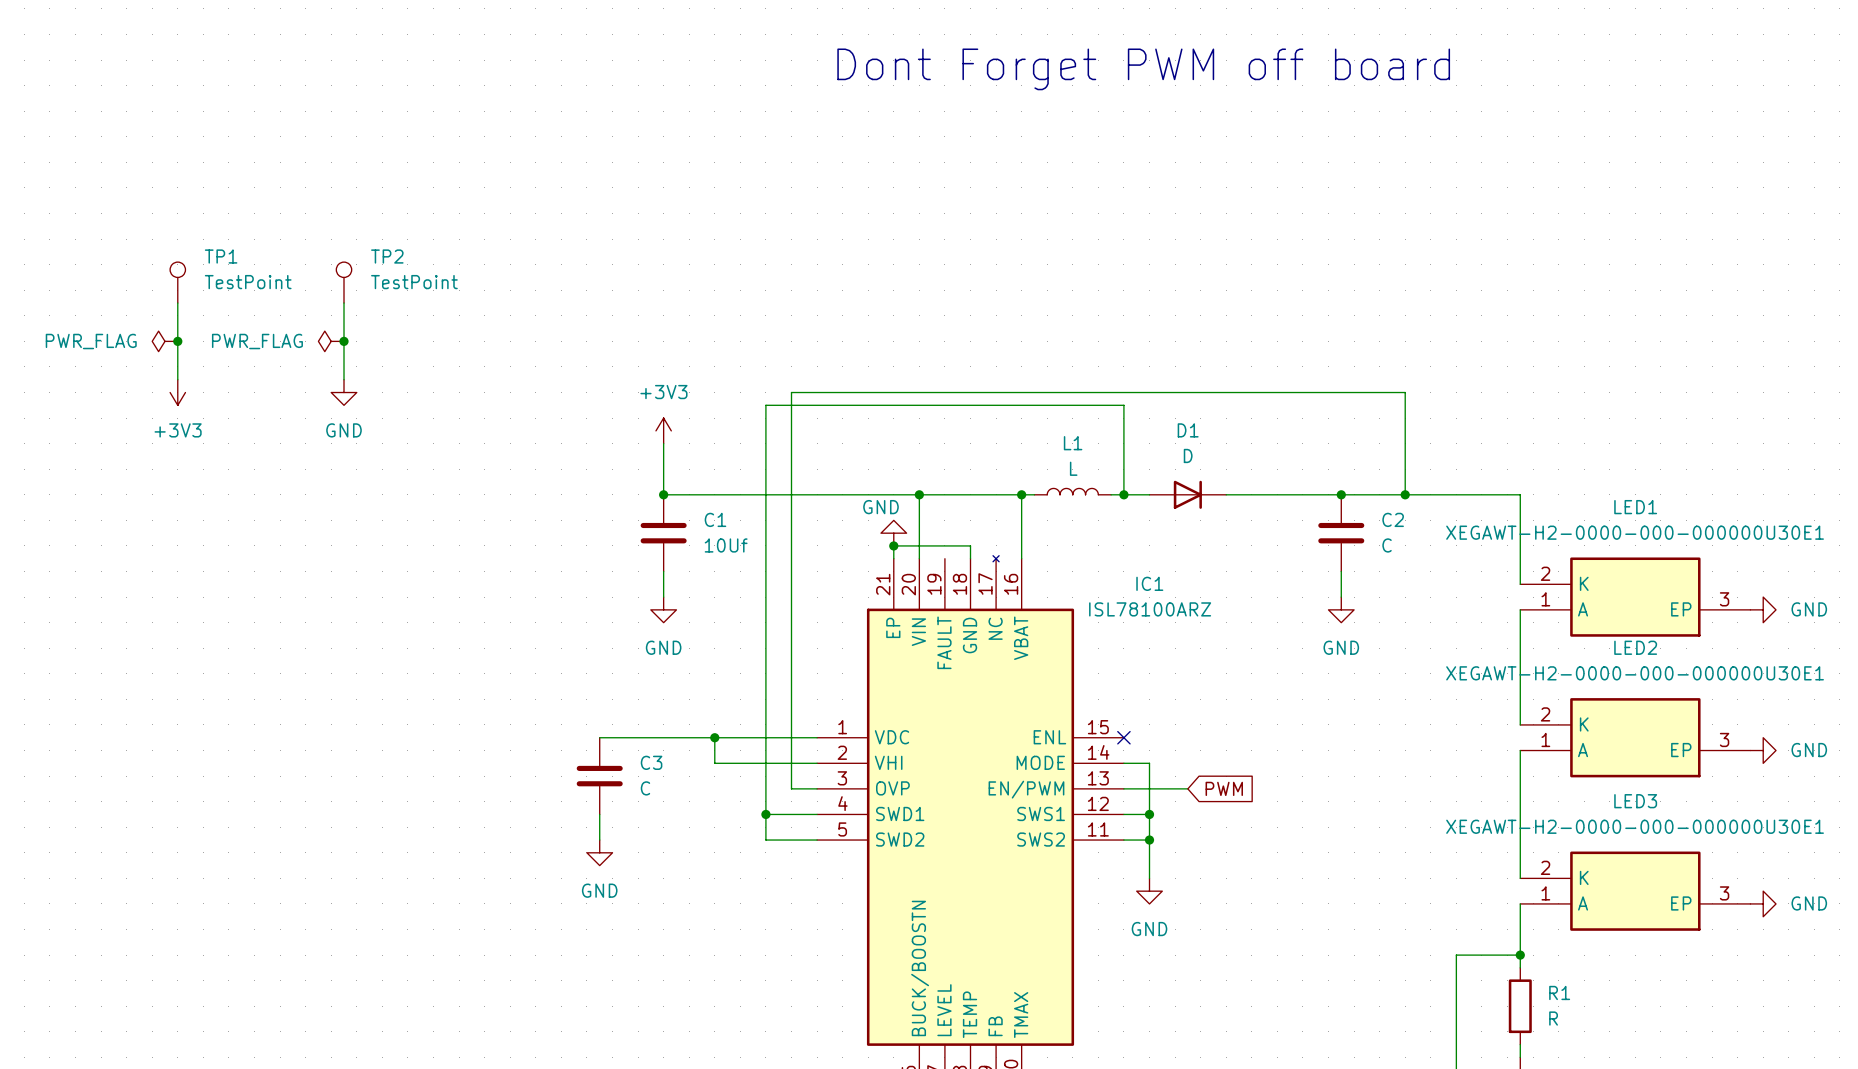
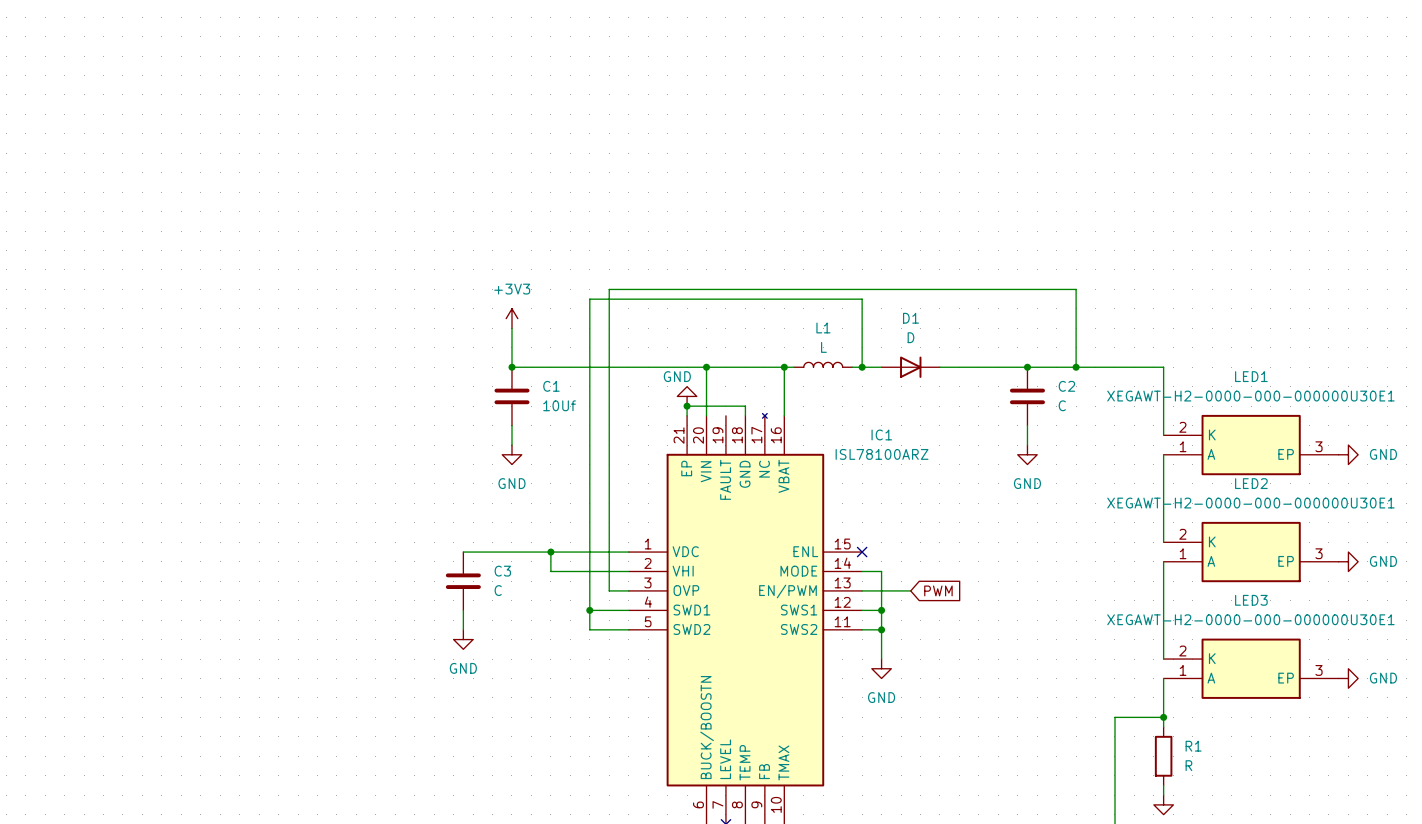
text: Dont Forget PWM off board (1143, 69) -> none
TP1: TestPoint (177, 282) -> none
TP2: TestPoint (344, 282) -> none
wire: (177, 303) (177, 379) -> none
wire: (344, 303) (344, 379) -> none
power symbol: PWR_FLAG (164, 341) -> none
junction: (177, 341) -> none
power symbol: PWR_FLAG (331, 341) -> none
junction: (344, 341) -> none
power symbol: +3V3 (177, 392) -> none
power symbol: GND (344, 392) -> none

